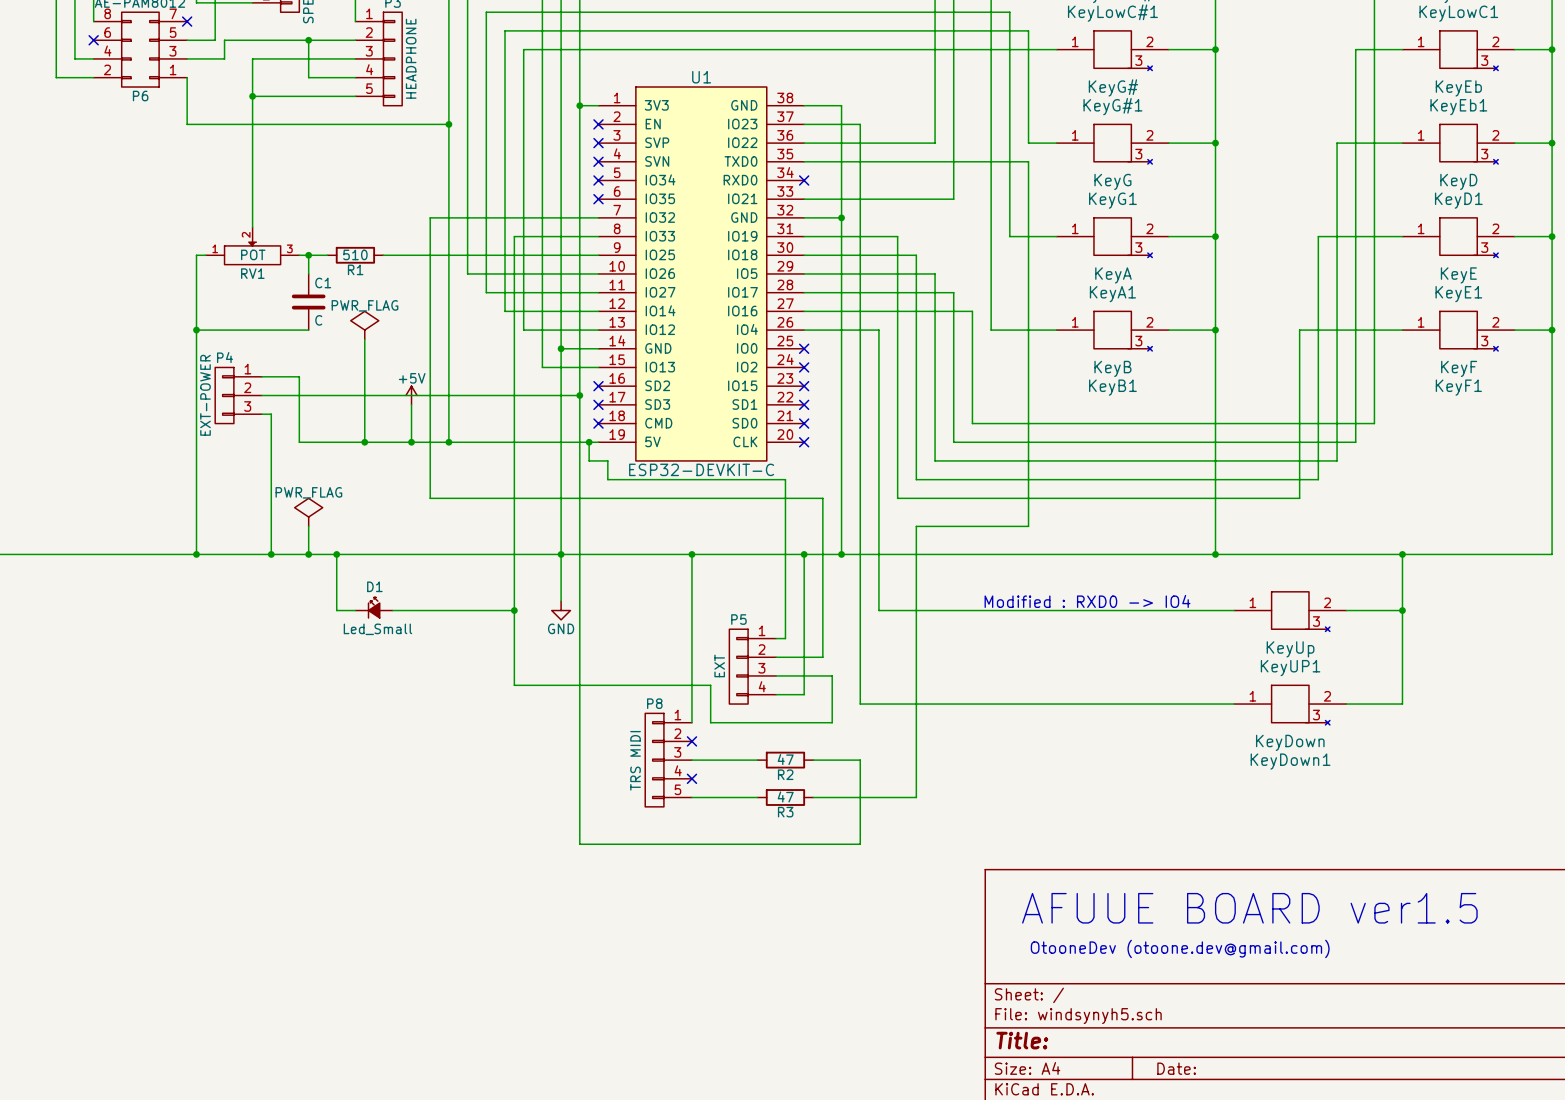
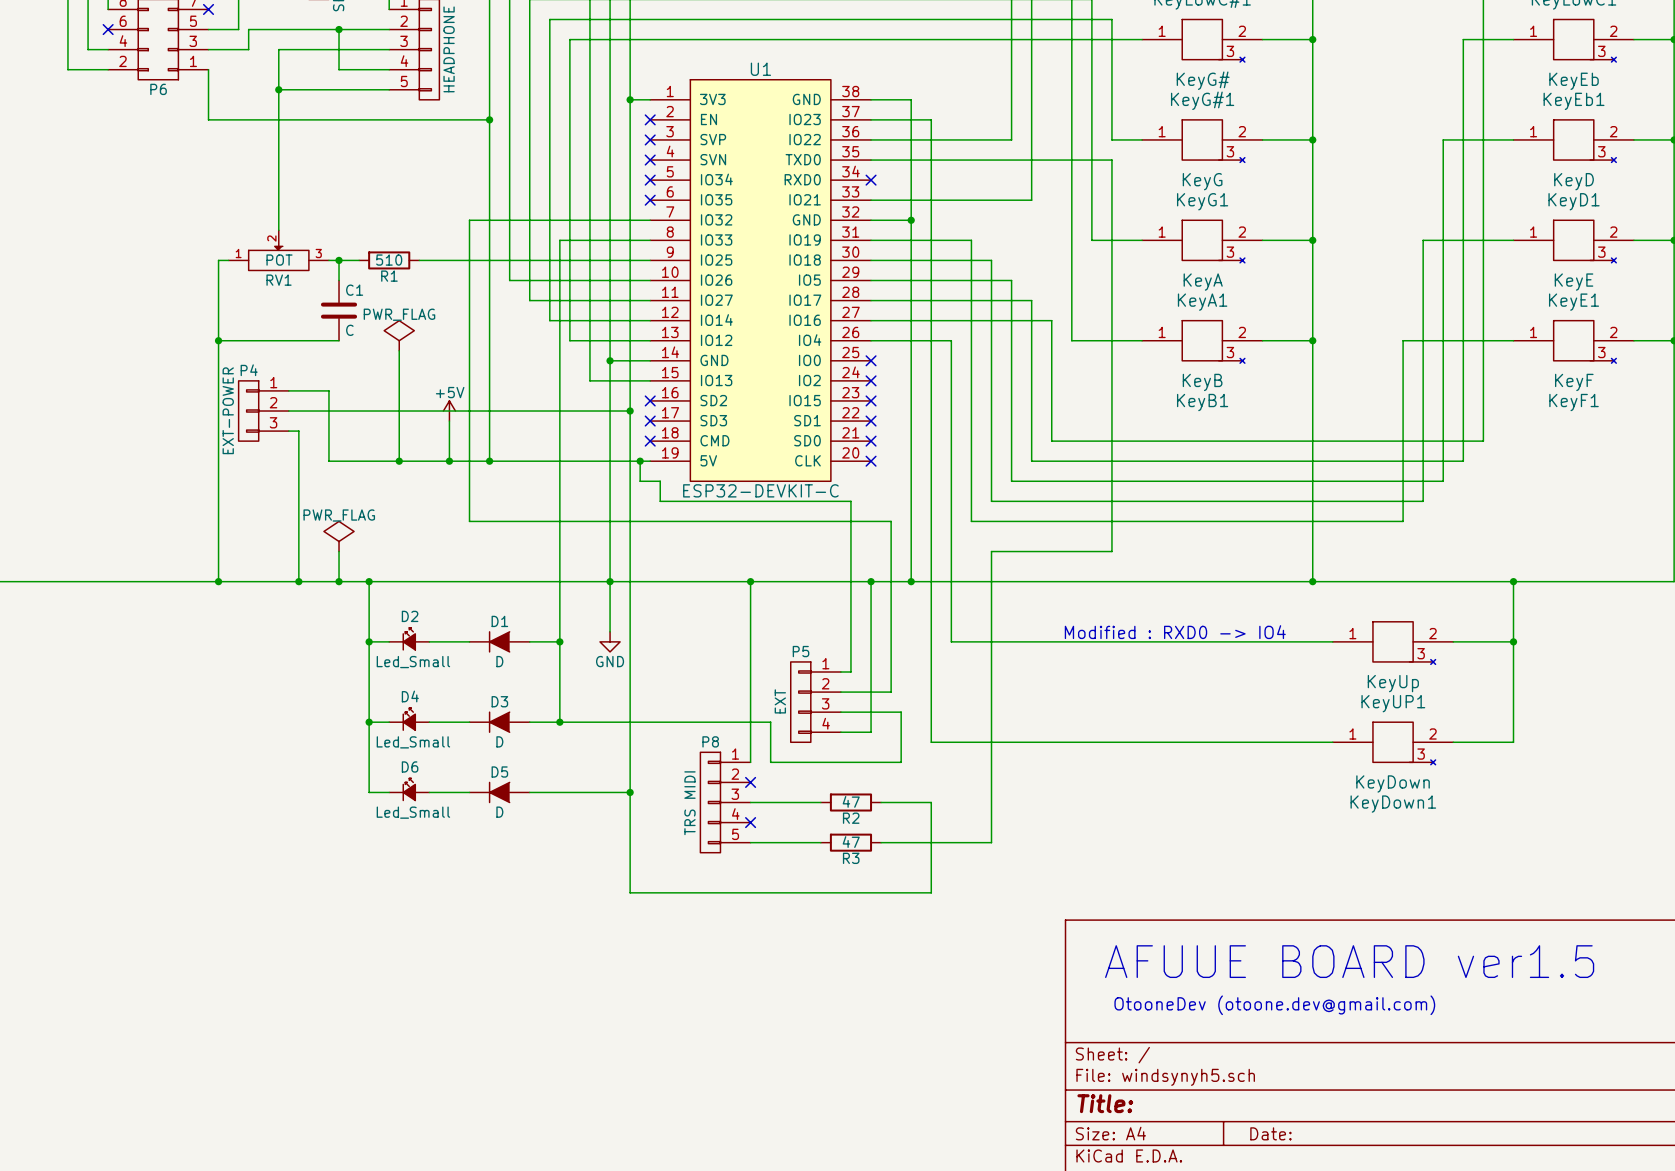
D1 name: D1 (374, 586) -> D2 (410, 616)
wire: none -> (369, 641) (369, 792) (389, 792)
junction: none -> (369, 641)
D1: none -> D (499, 641)
D4: none -> Led_Small (409, 719)
wire: none -> (369, 722) (389, 722)
junction: none -> (369, 722)
wire: none -> (429, 722) (469, 722)
D3: none -> D (499, 722)
wire: none -> (529, 722) (559, 722)
junction: none -> (559, 722)
D6: none -> Led_Small (409, 789)
wire: none -> (429, 792) (469, 792)
D5: none -> D (499, 792)
wire: none -> (529, 792) (630, 792)
junction: none -> (630, 792)

